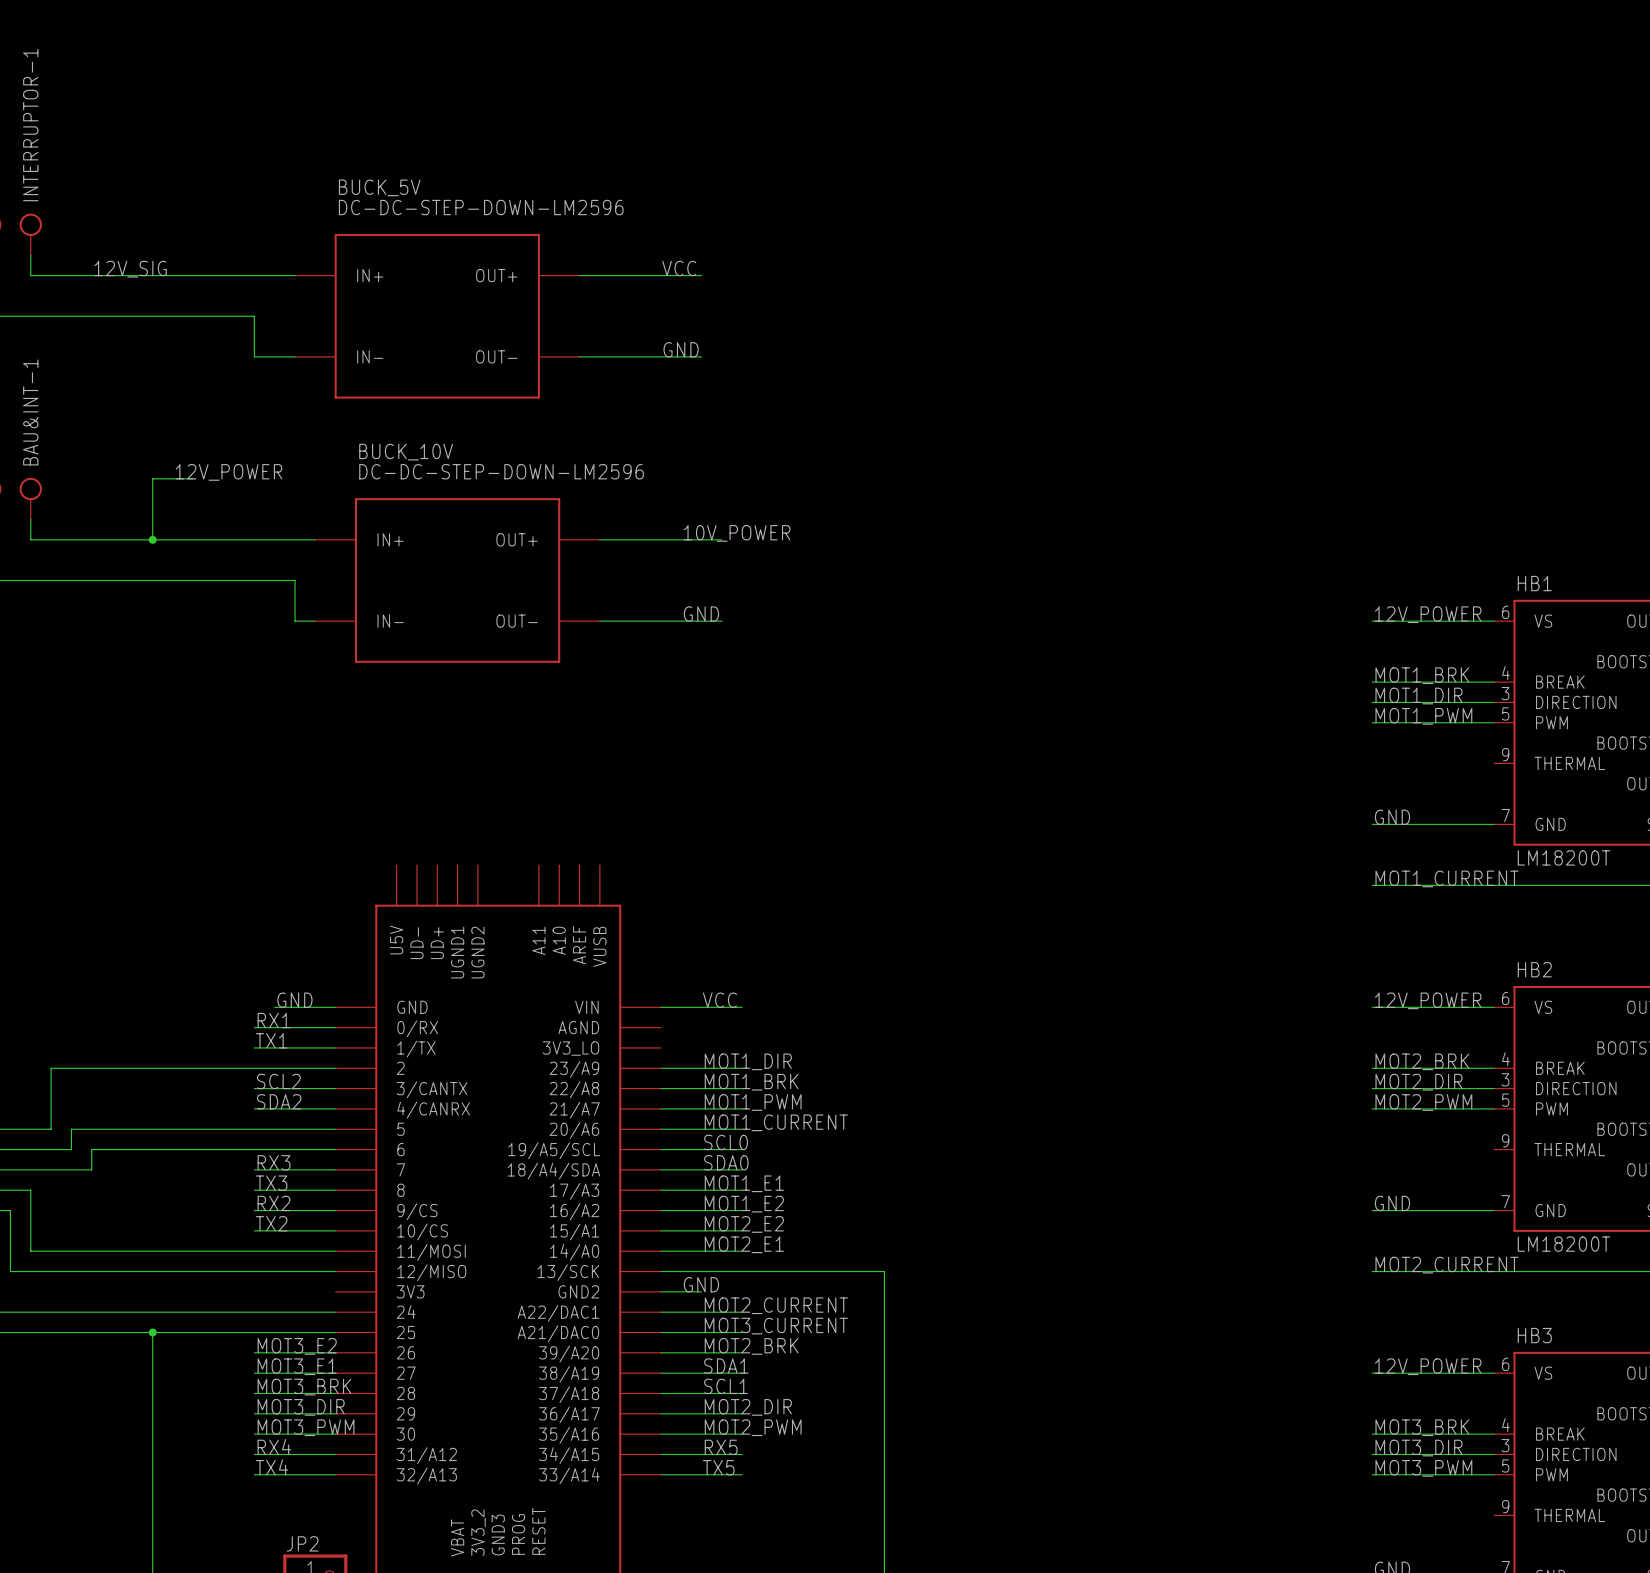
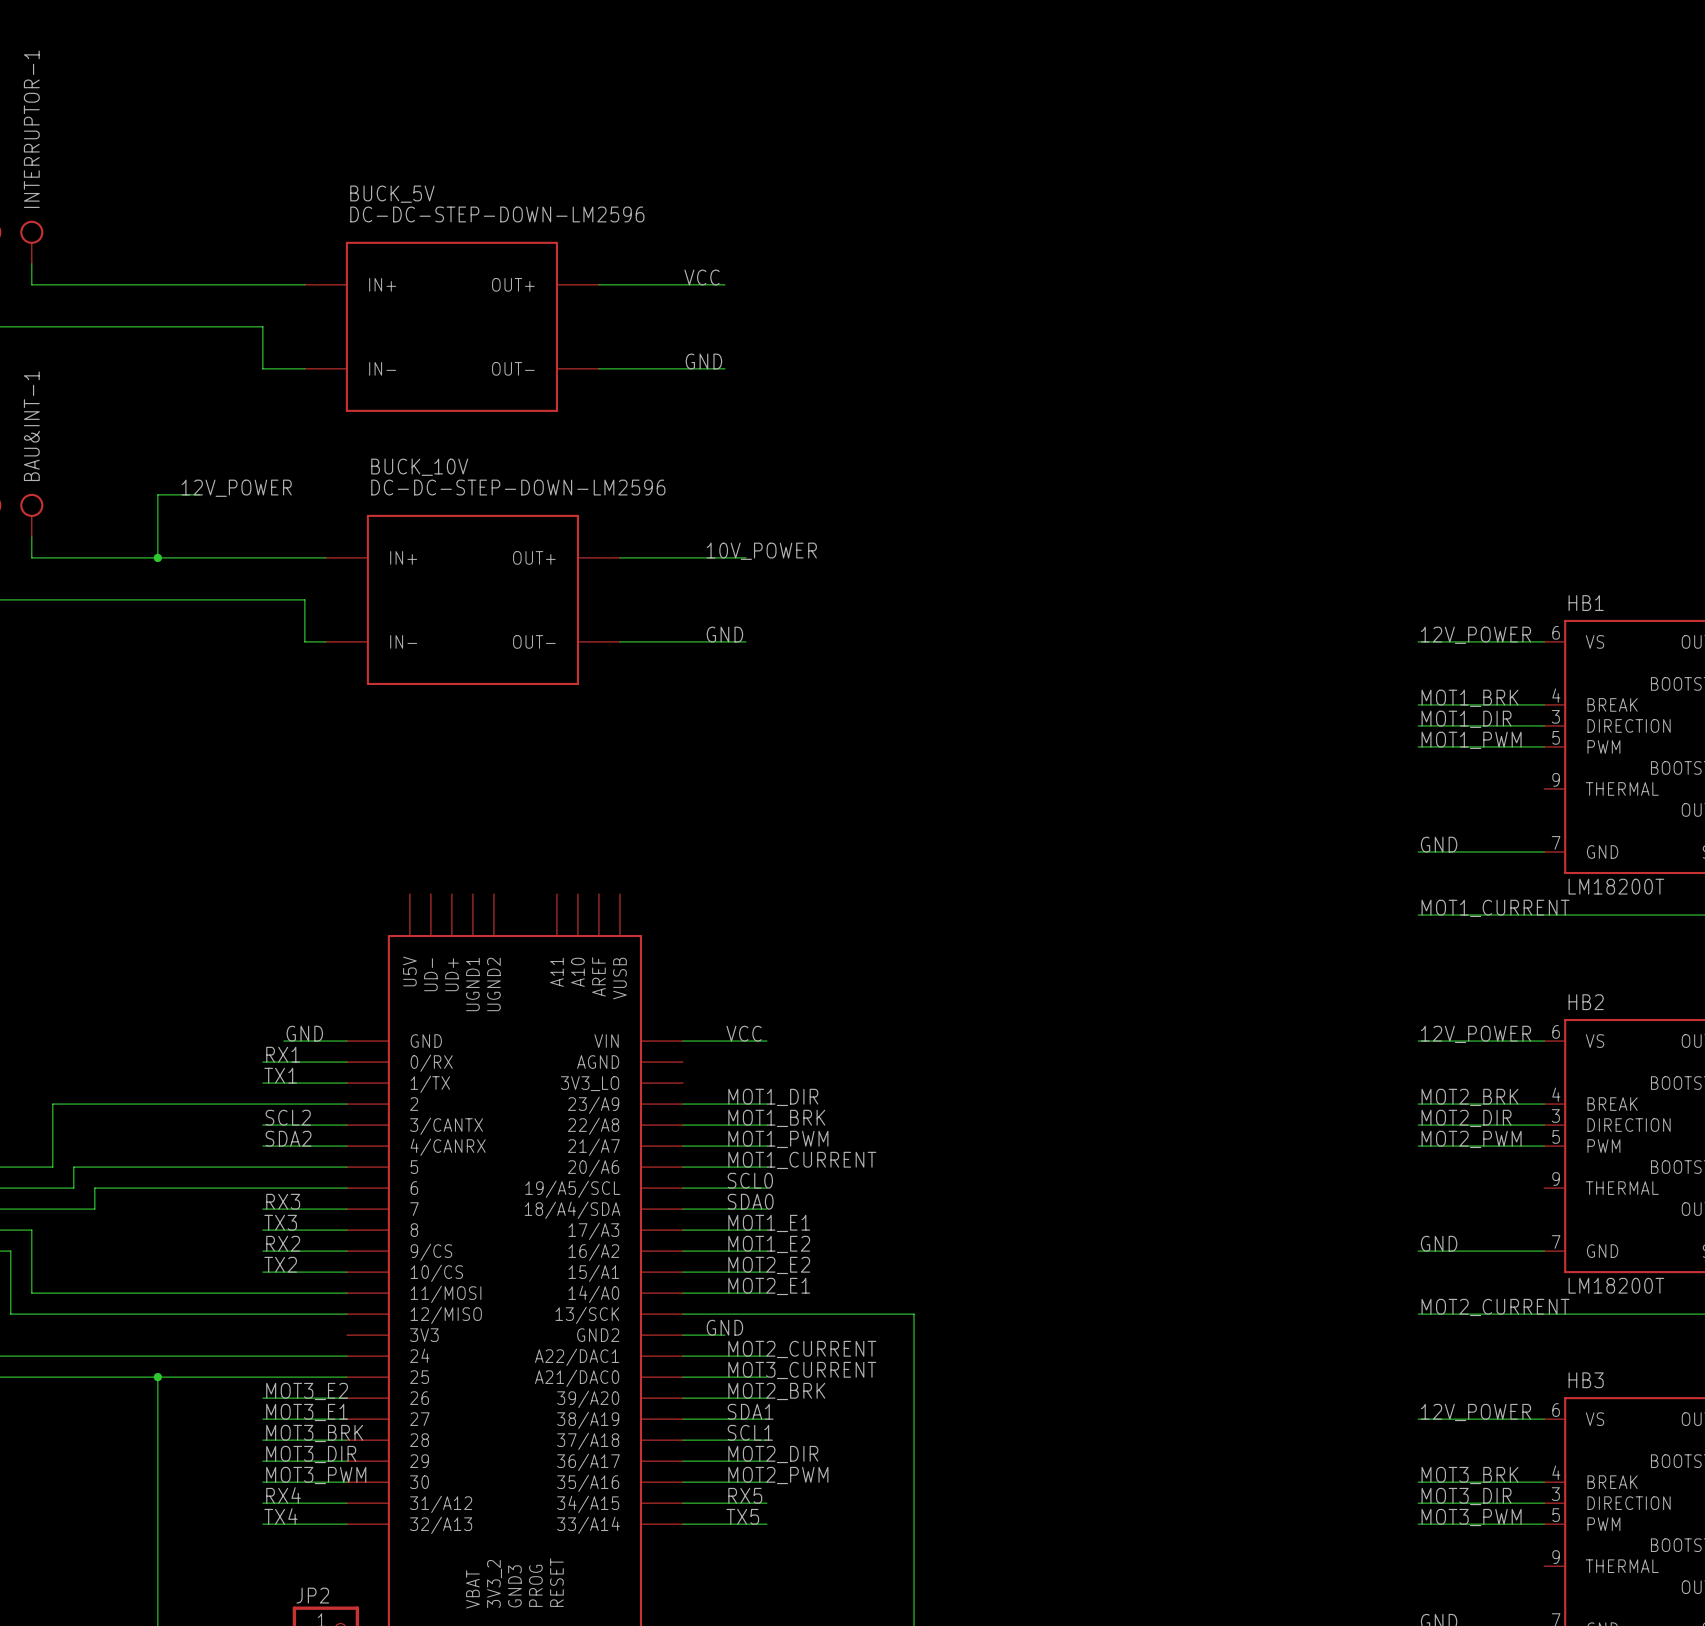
label: 12V_SIG (130, 269) -> none

